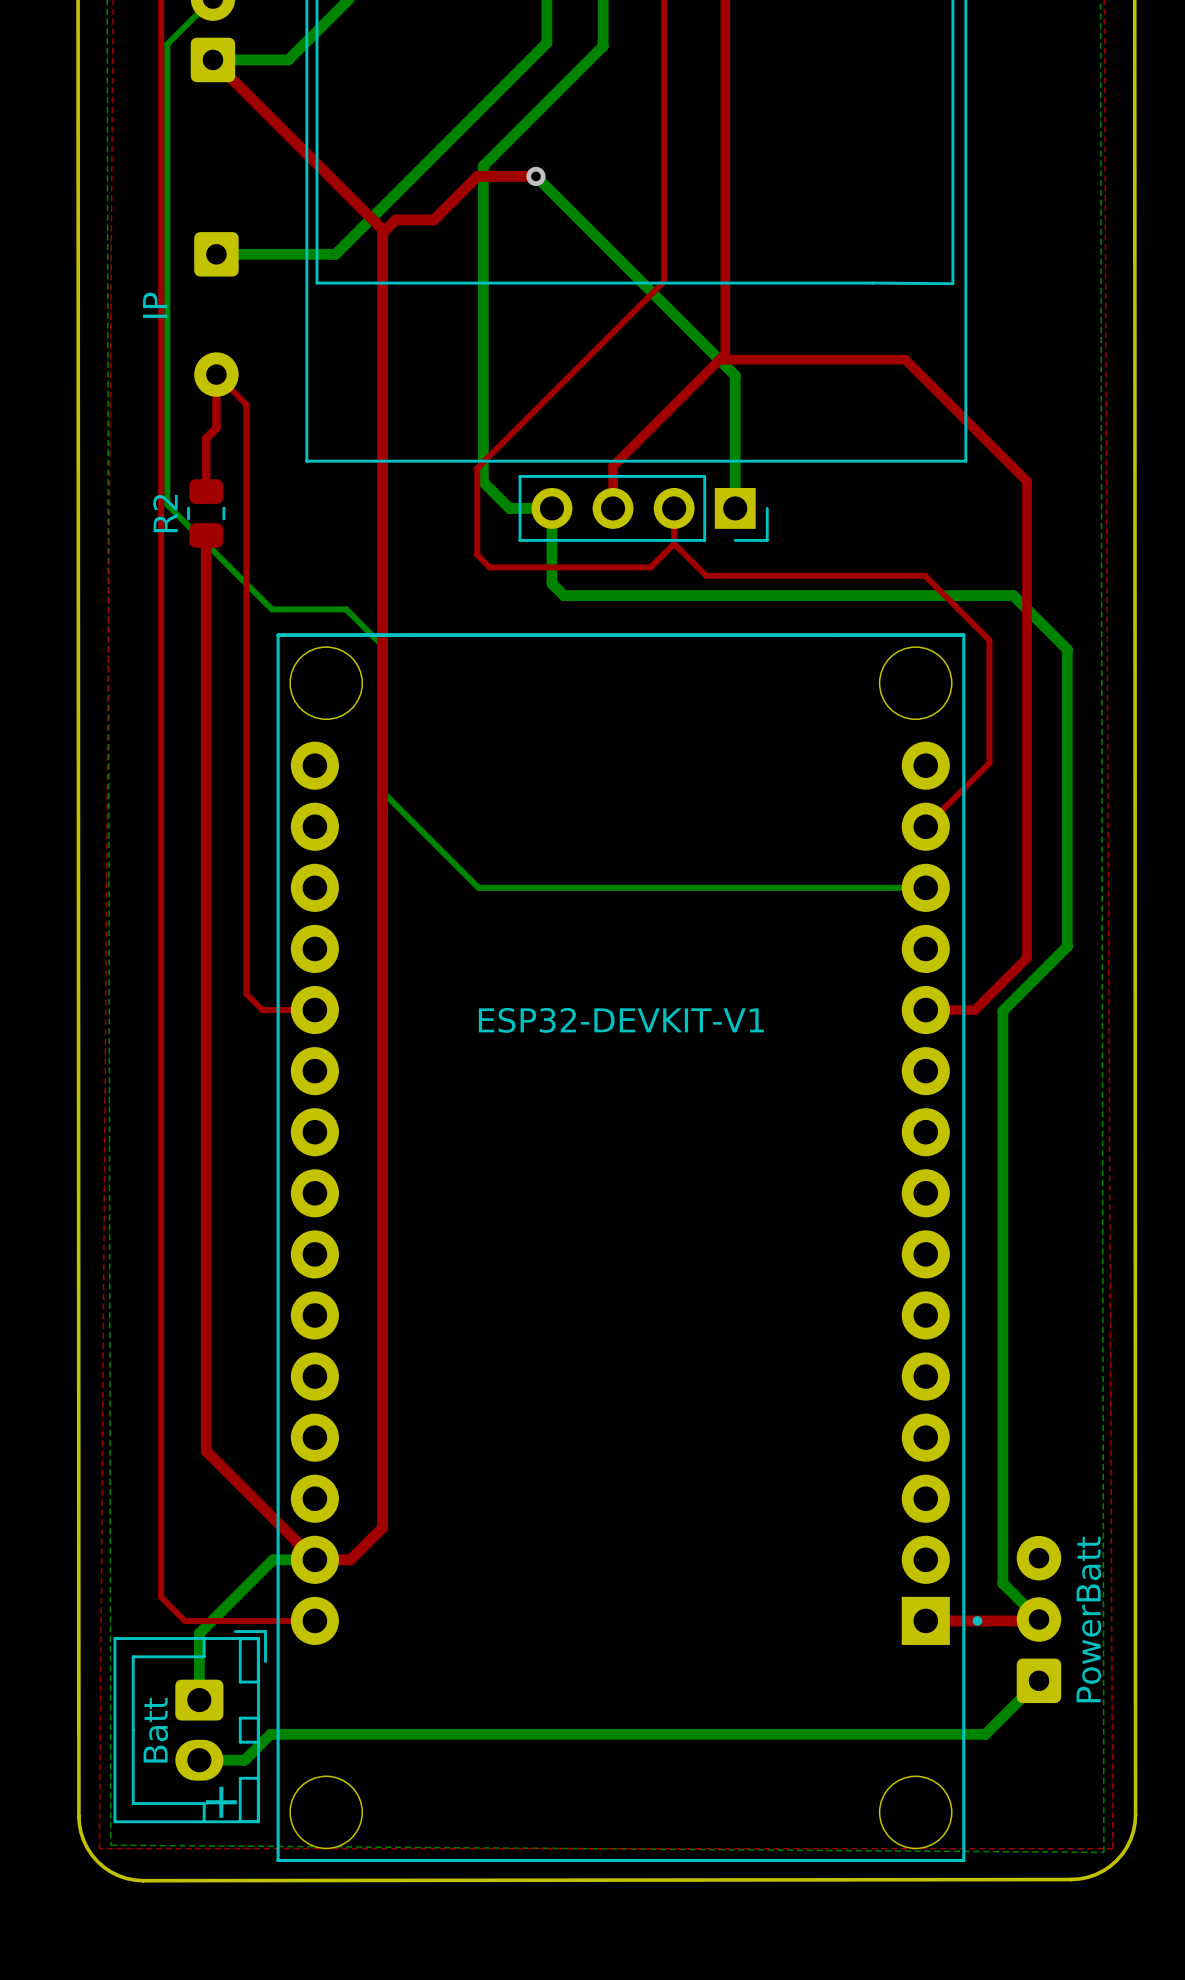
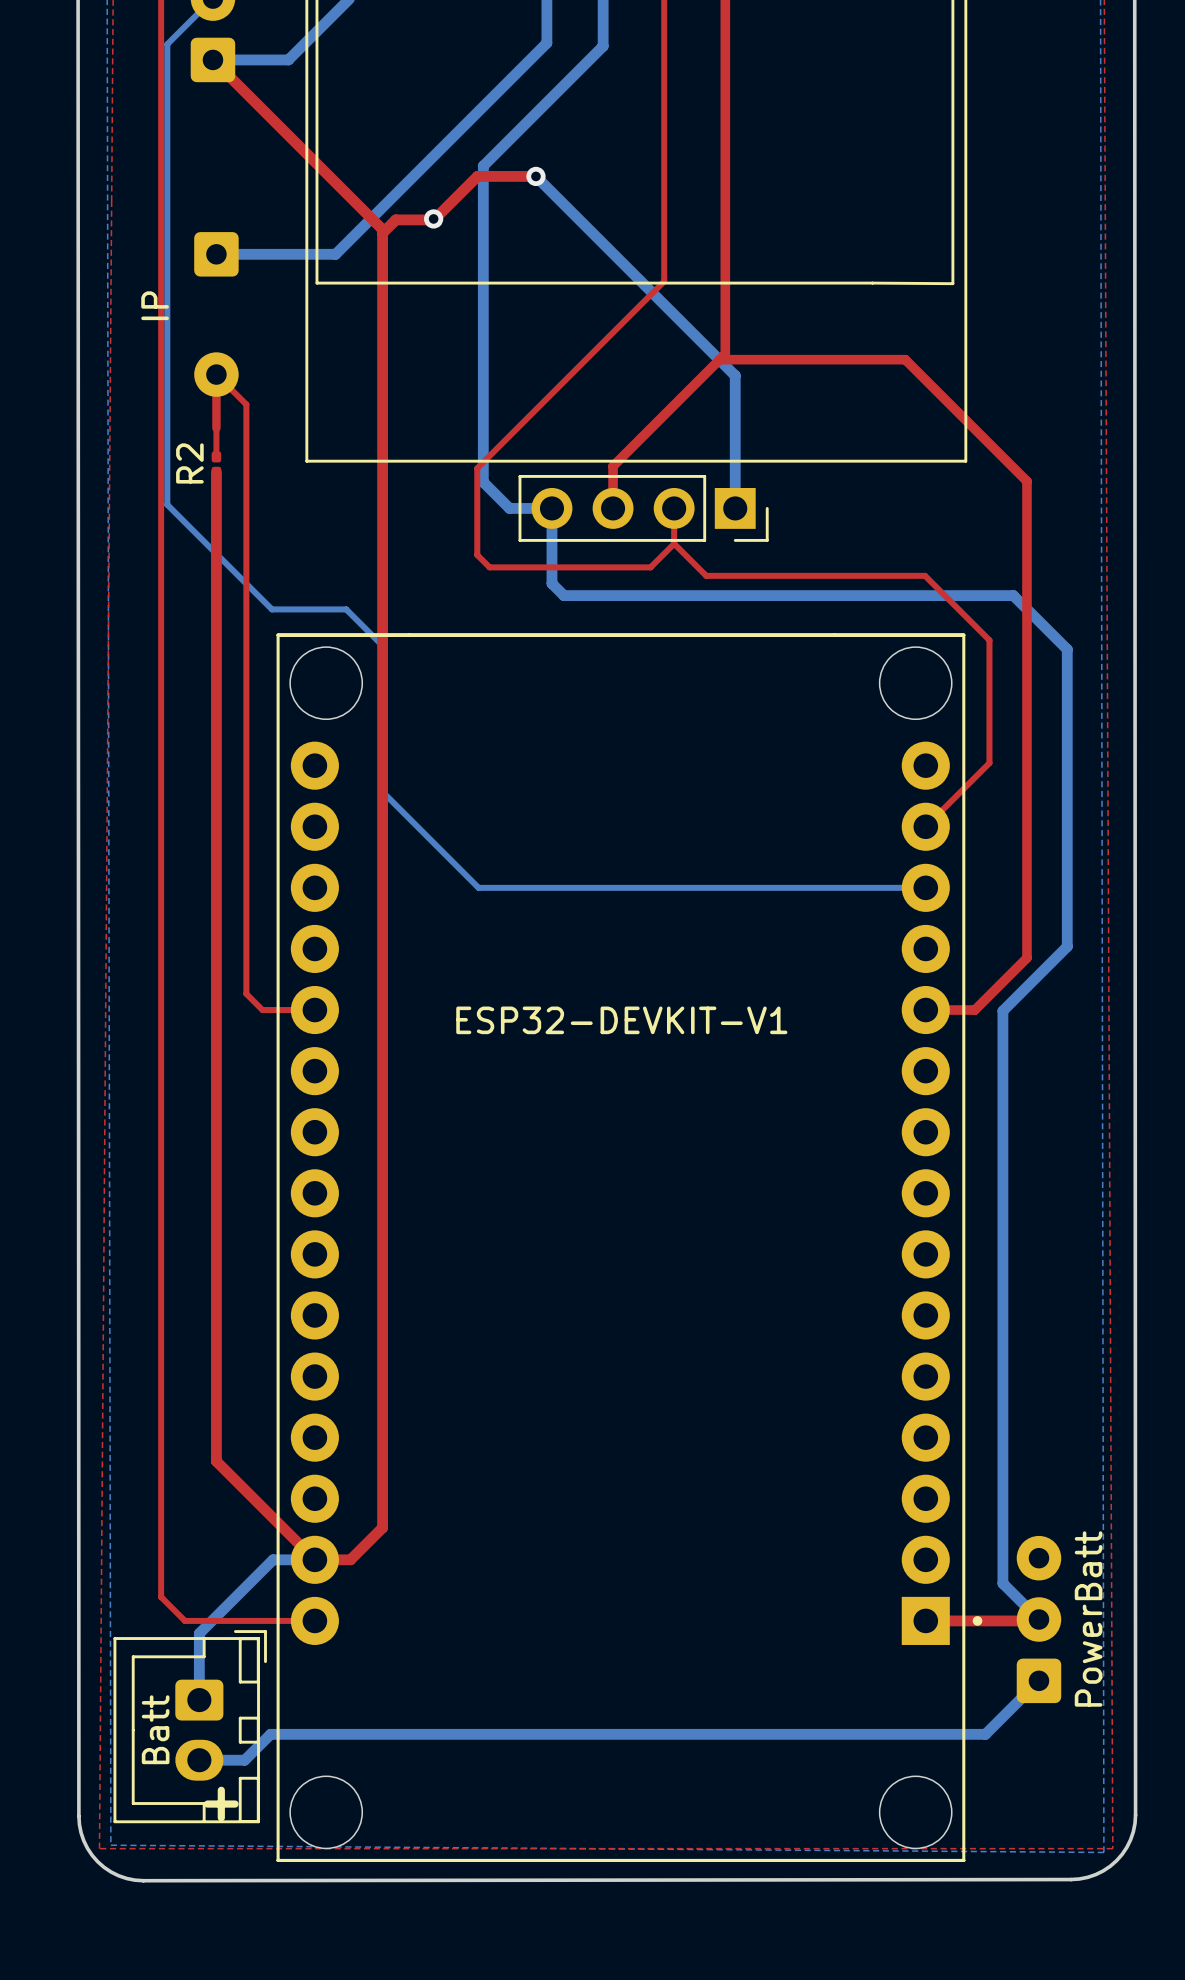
via: none -> (433, 218)
top track: (216, 428) (206, 438) (206, 491) -> (216, 428) (216, 456)
R2 footprint: [187, 479, 226, 548] -> [211, 451, 222, 478]
top track: (206, 535) (206, 1451) (216, 1461) -> (216, 472) (216, 1461)

